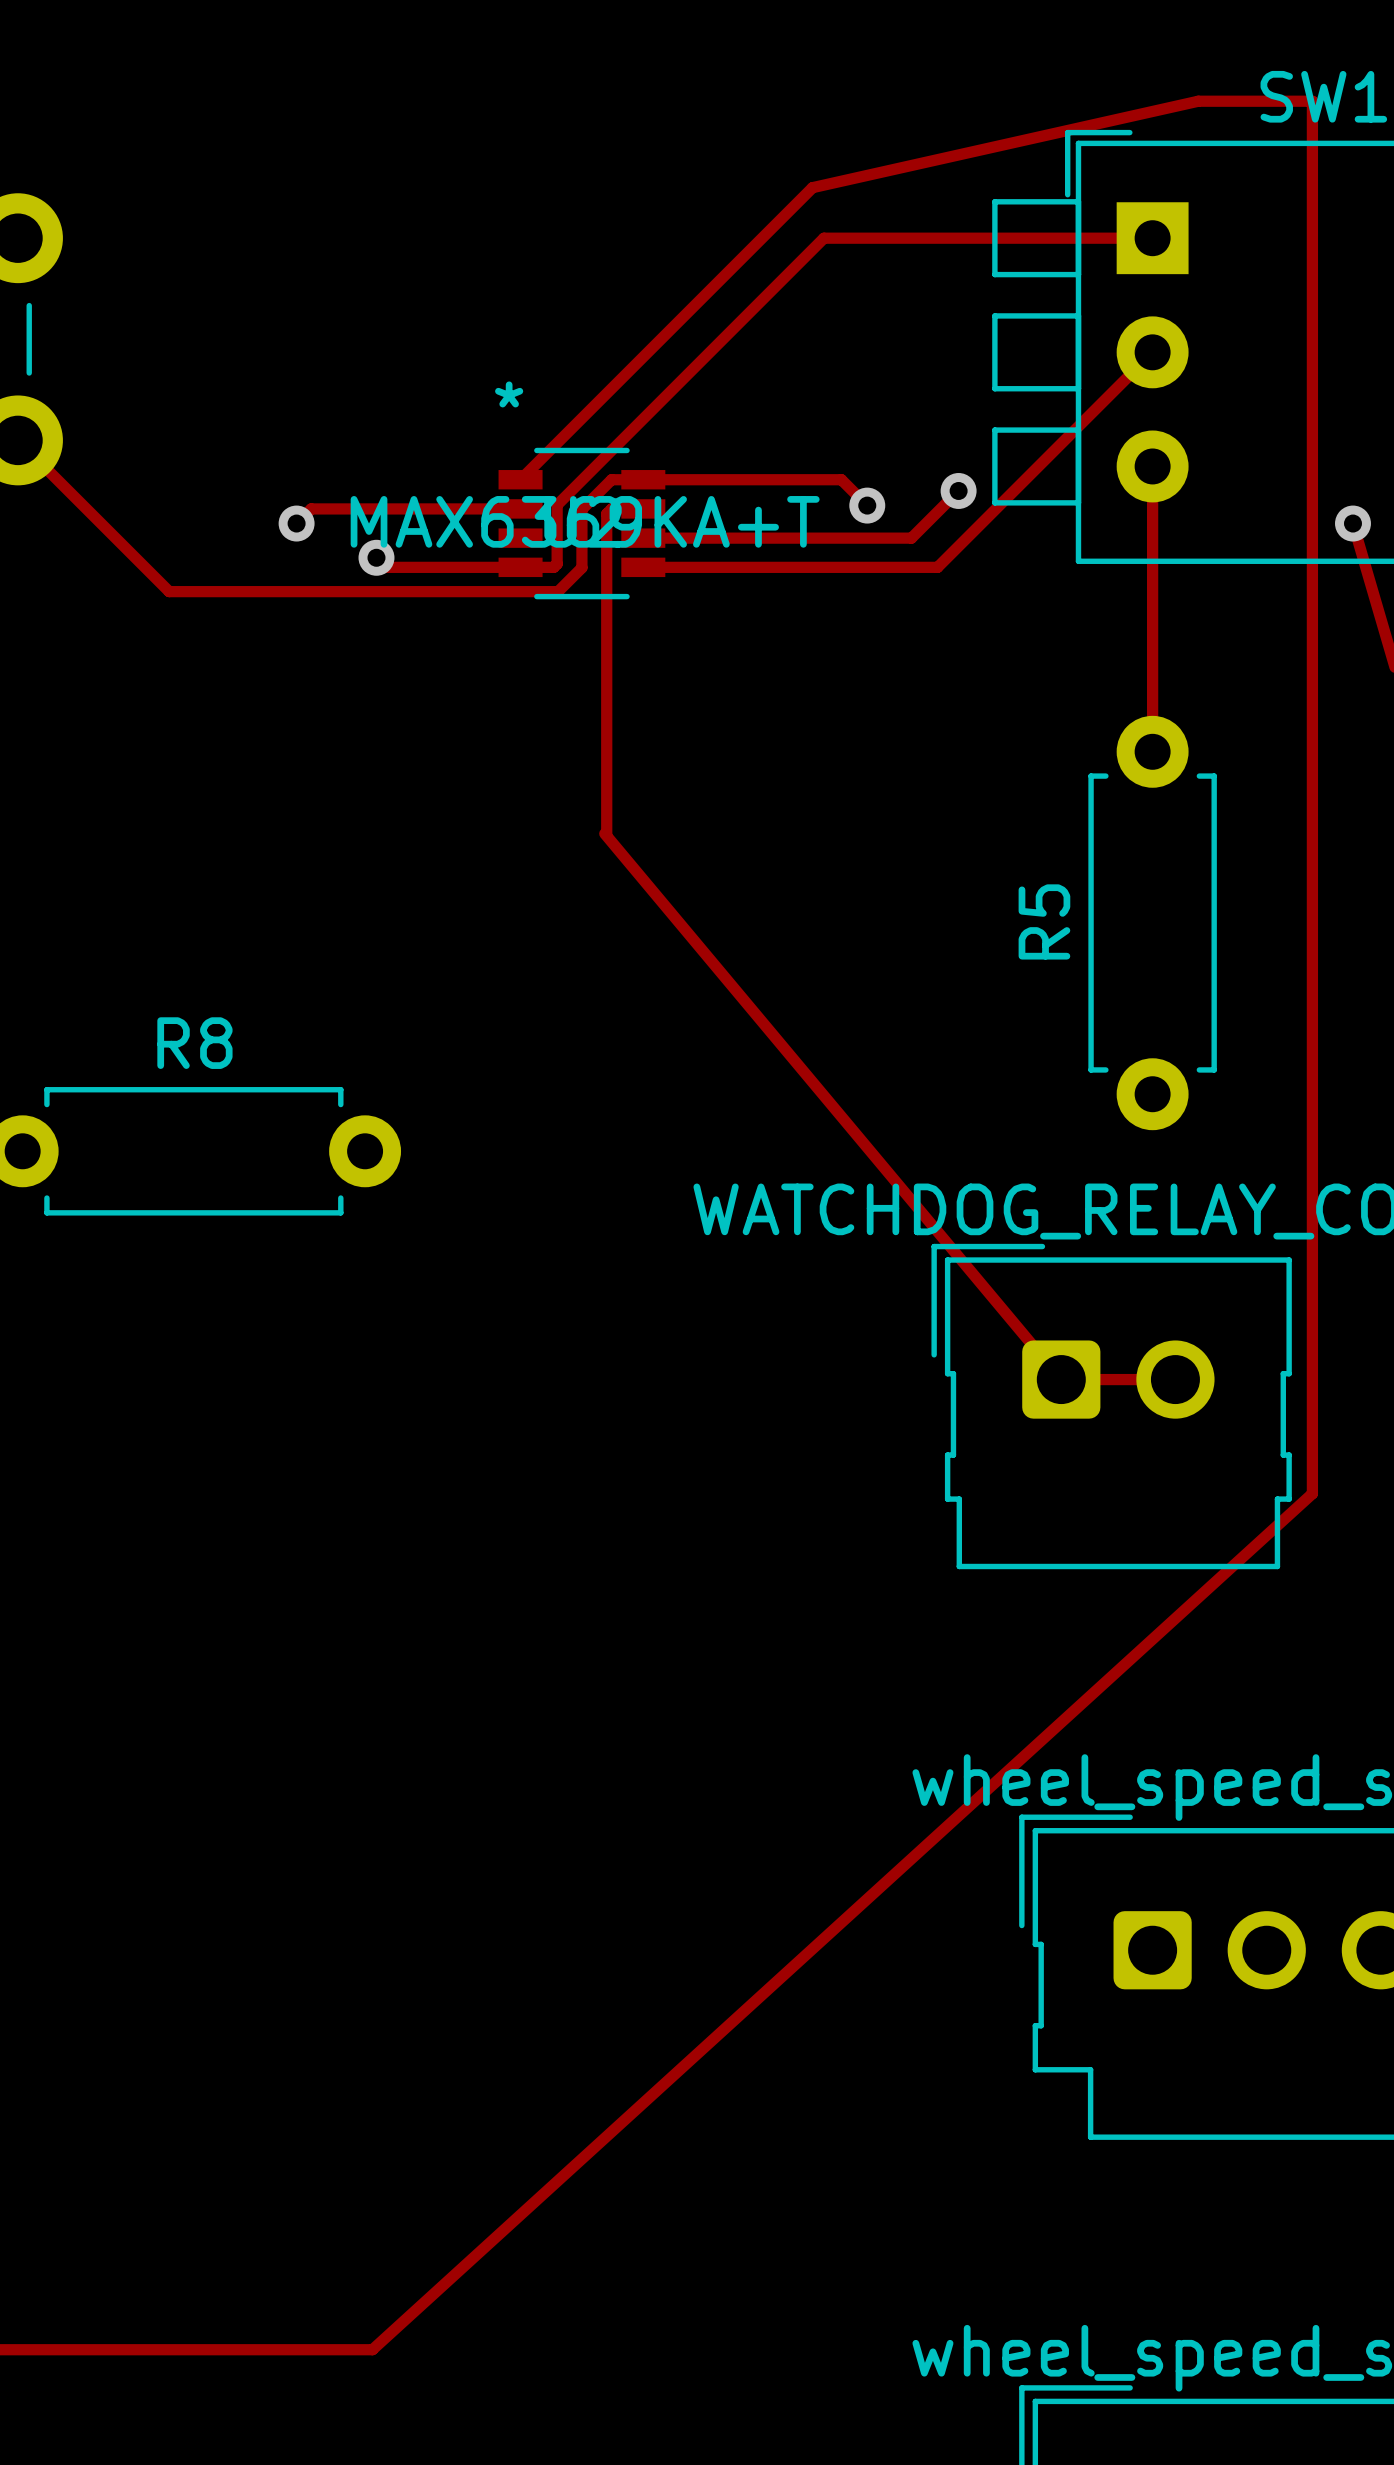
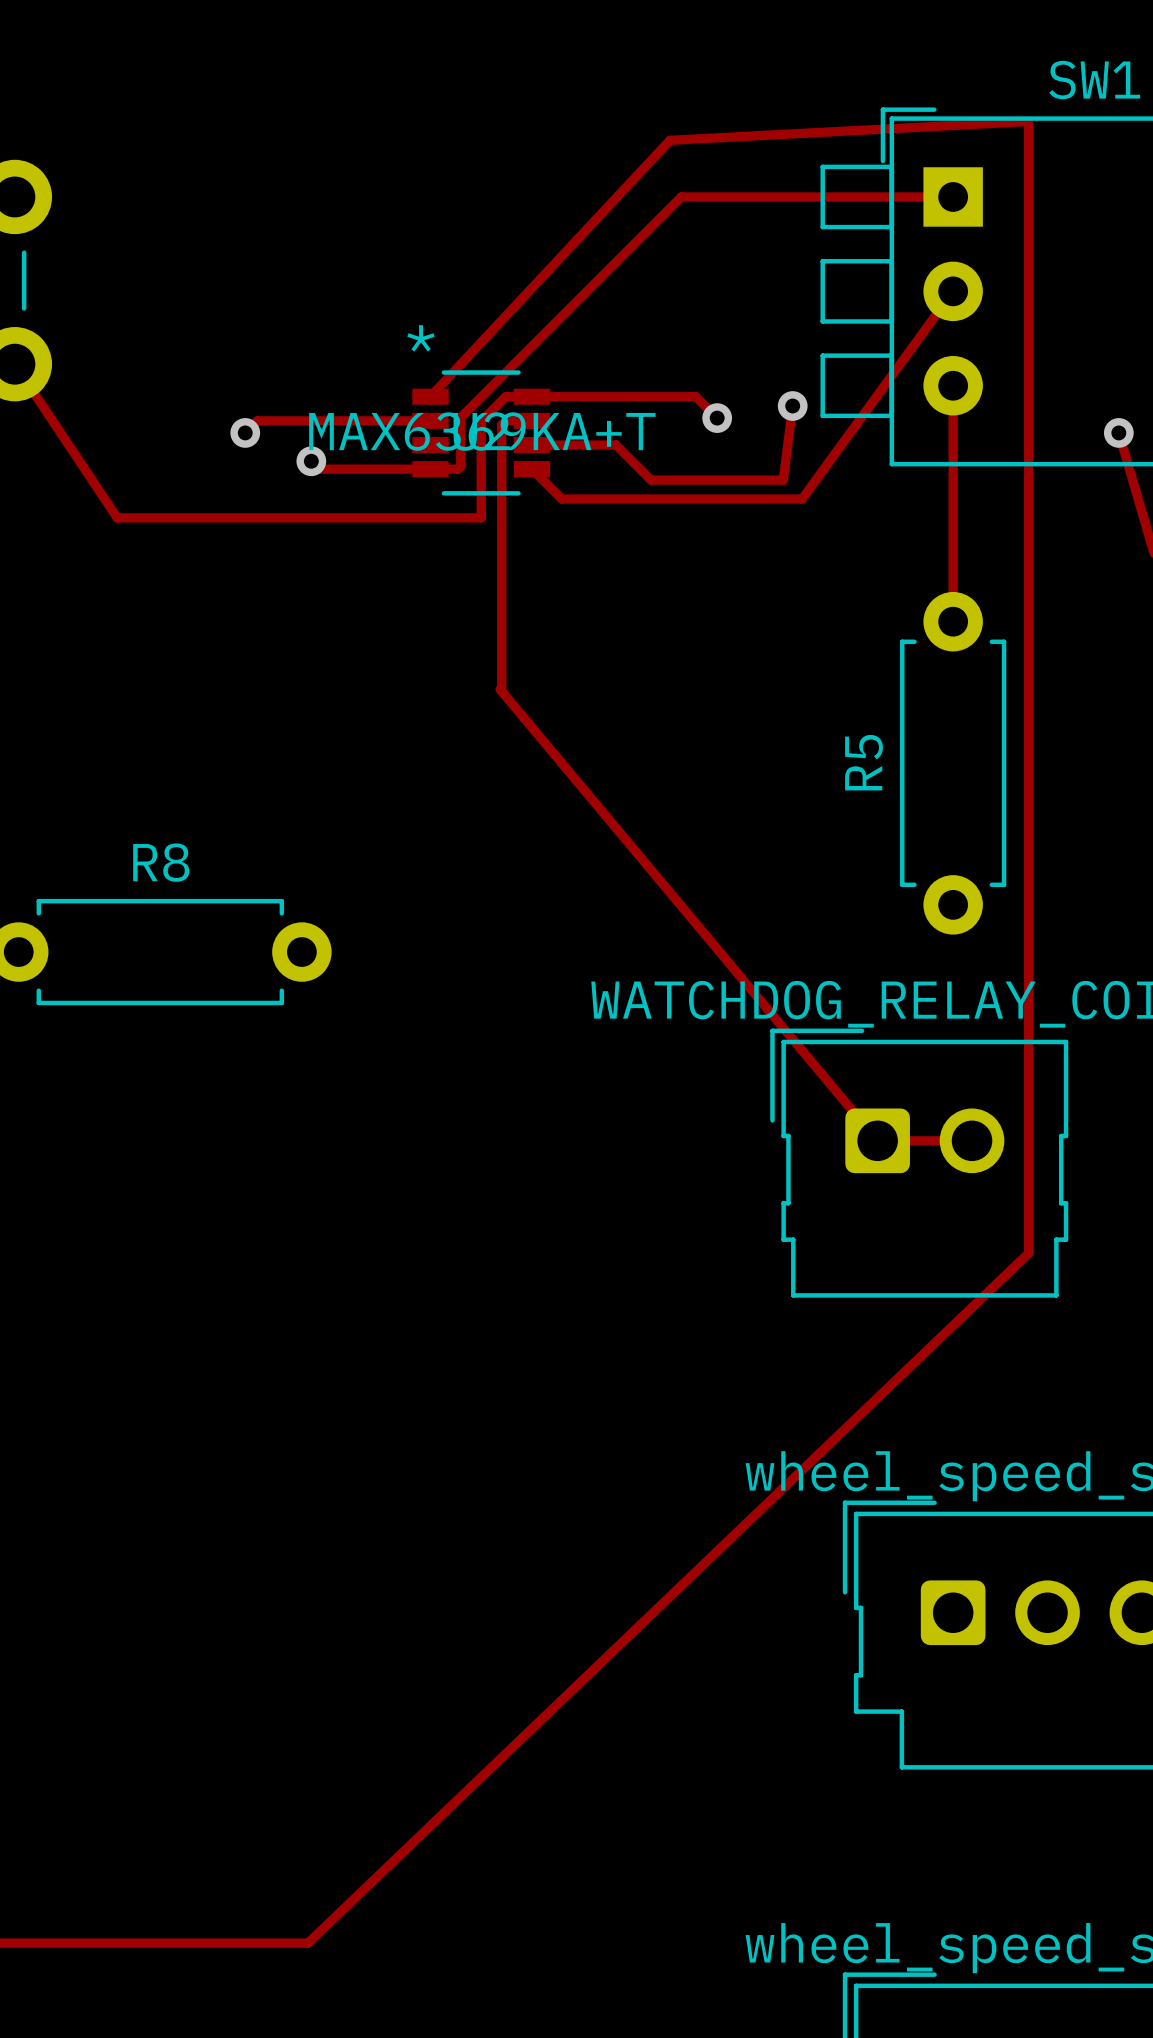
track: (1152, 352) (937, 567) (643, 567) -> (953, 291) (802, 499) (561, 499) (531, 469)
track: (17, 440) (169, 591) (558, 591) (581, 567) -> (14, 364) (117, 517) (481, 517) (481, 469)
track: (520, 479) (812, 187) (1198, 101) (1312, 101) (1312, 1493) (372, 2349) -> (430, 396) (669, 140) (1028, 121) (1028, 1253) (308, 1943)
track: (958, 490) (911, 538) (744, 538) -> (792, 406) (783, 480) (651, 480) (616, 445)

